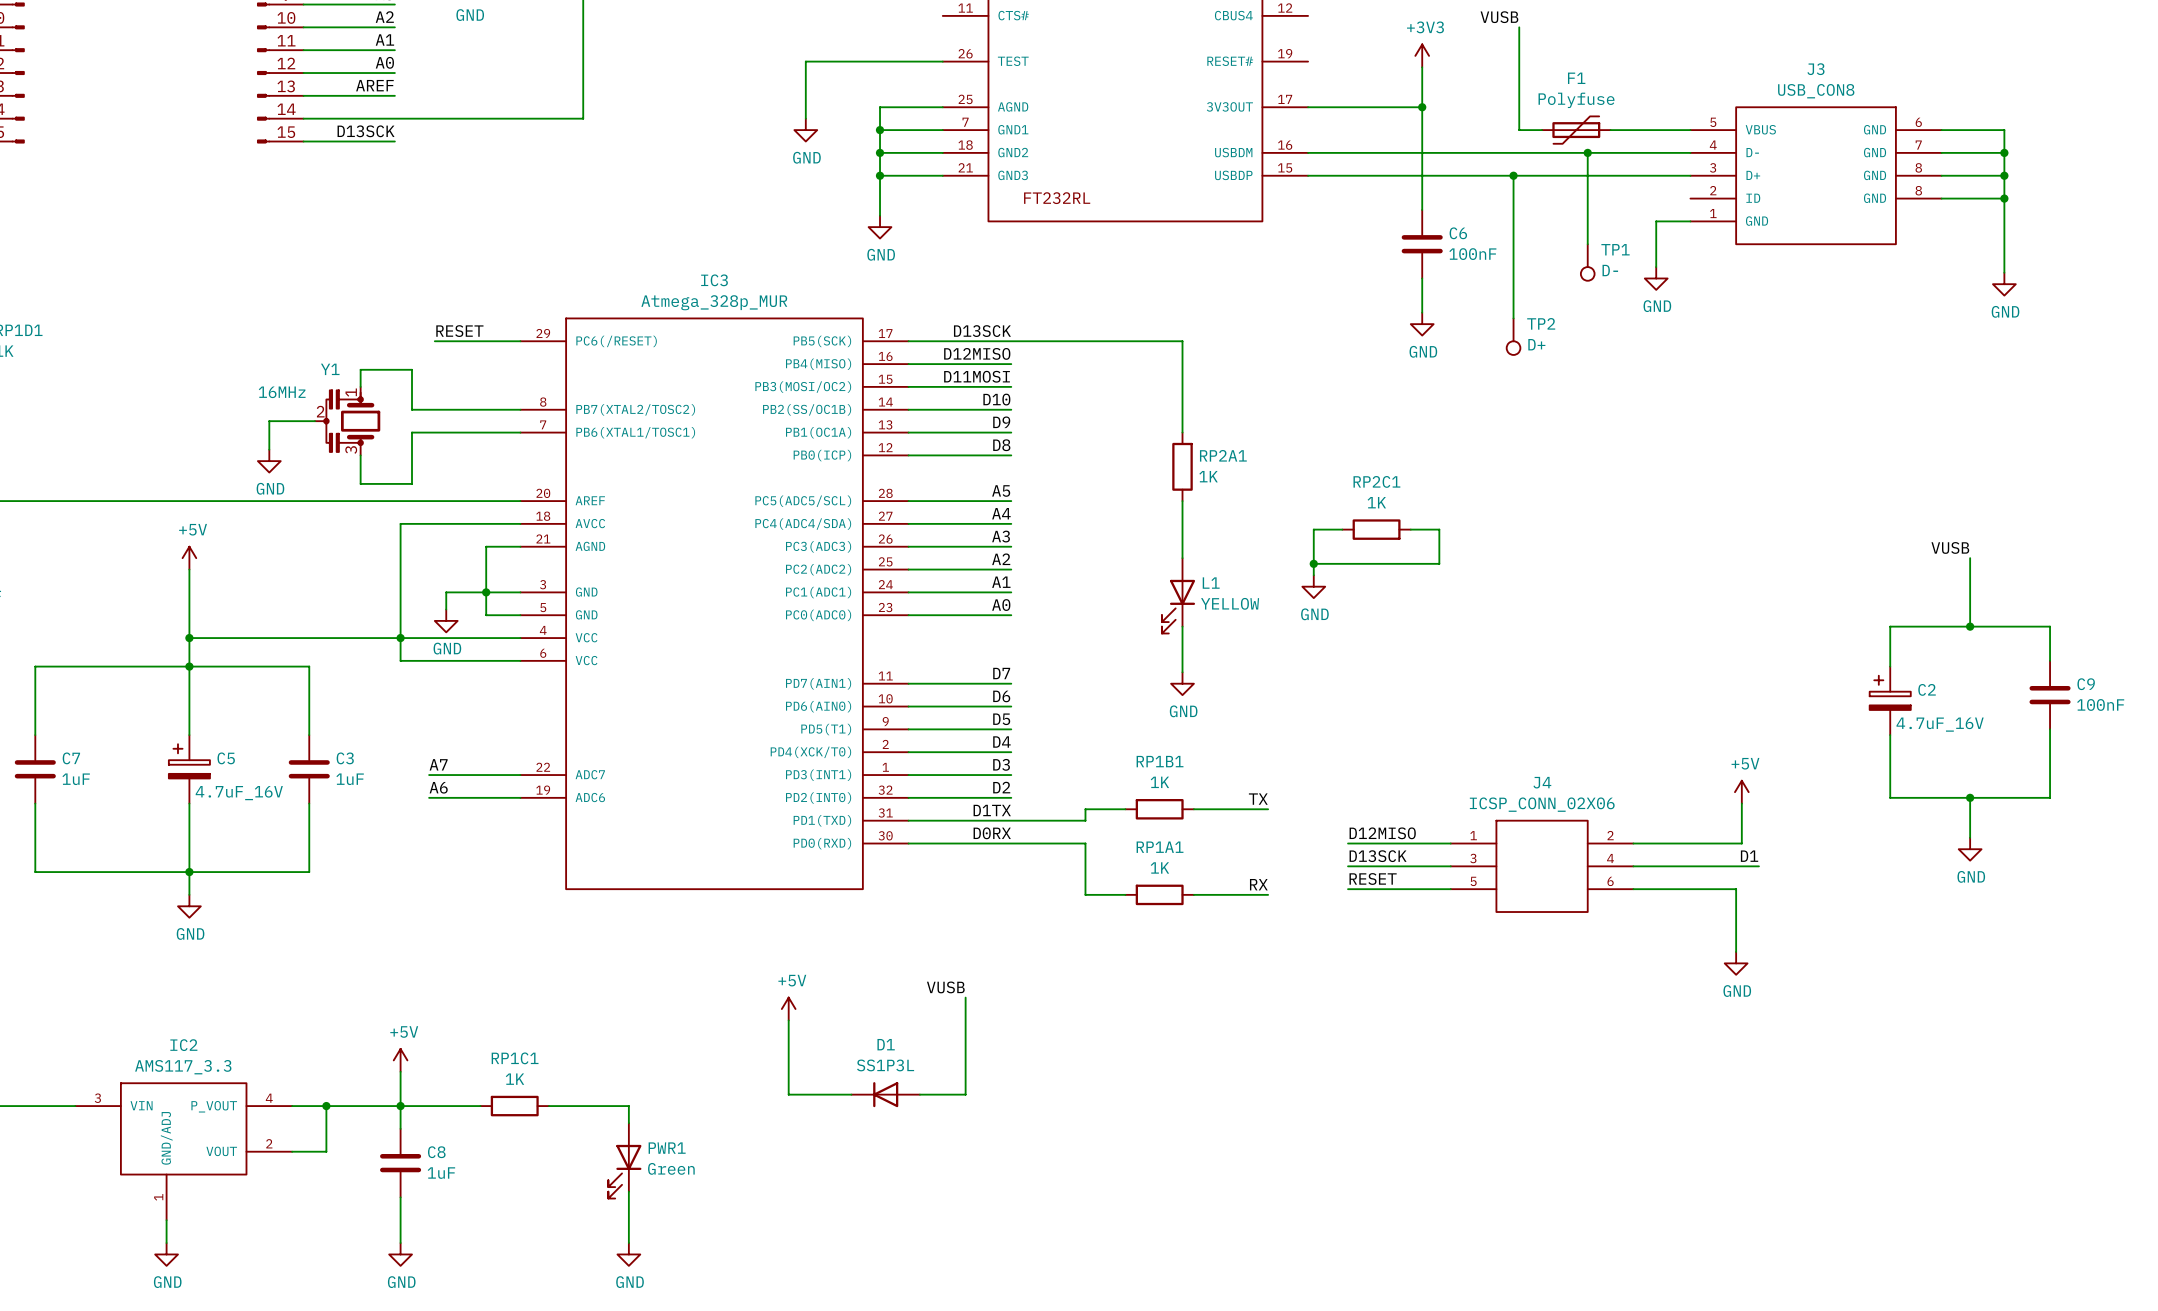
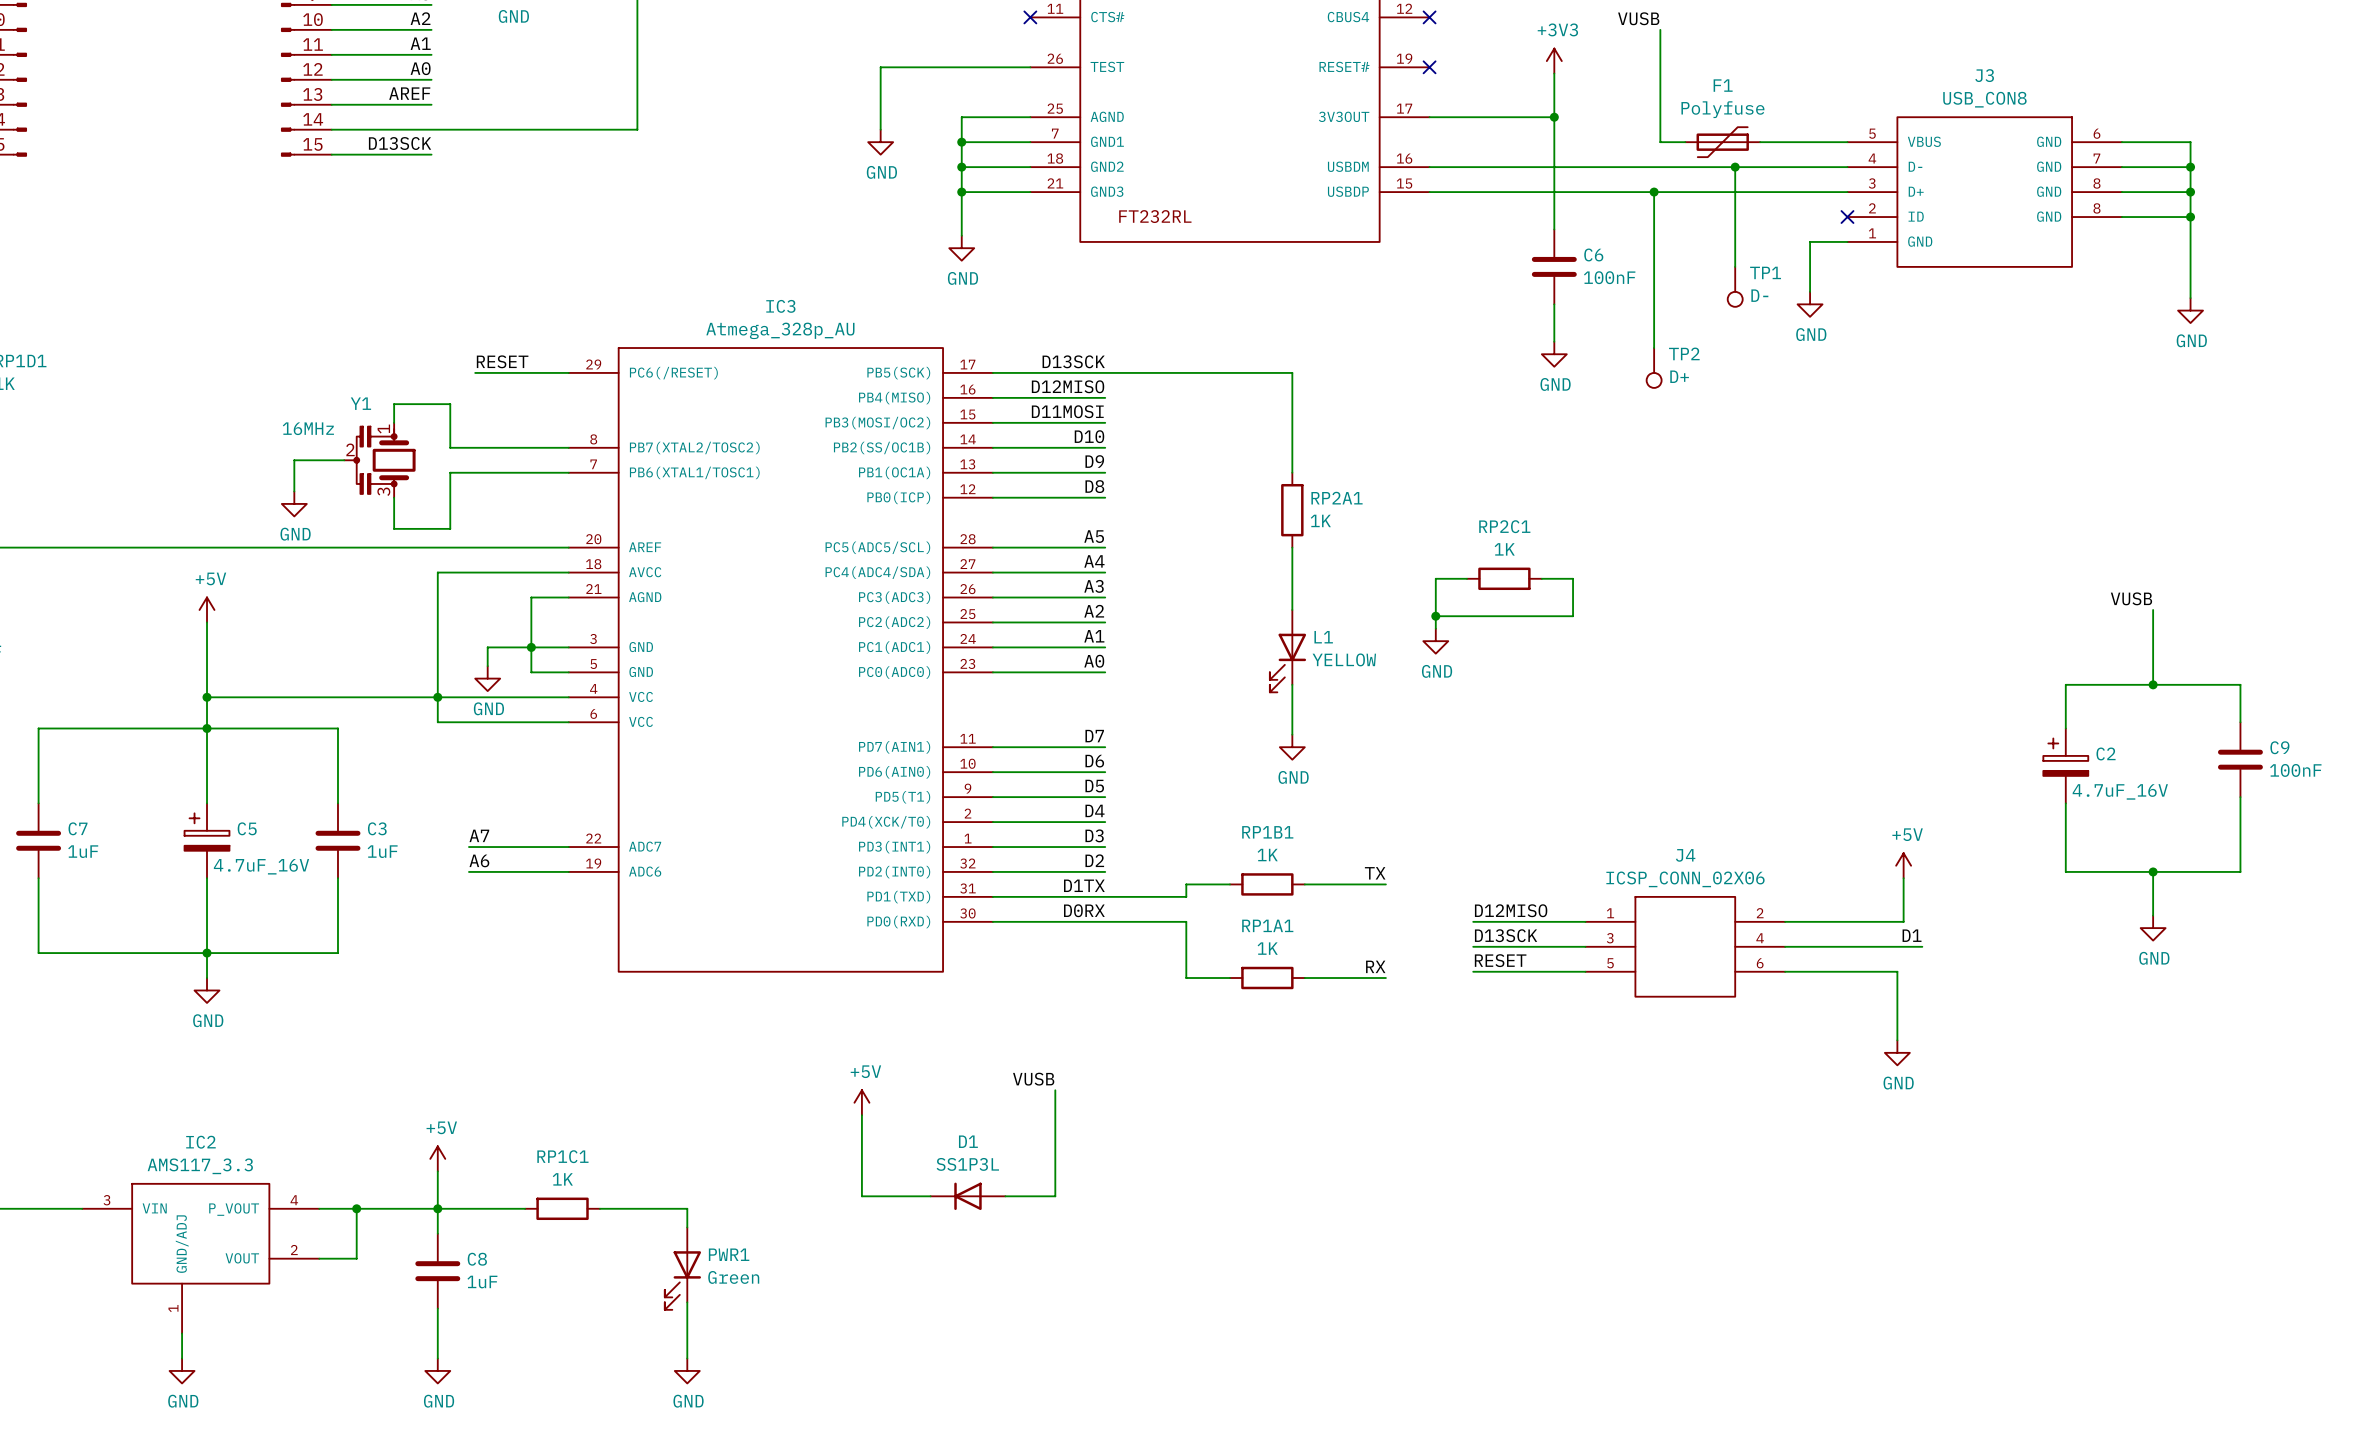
no-connect mark: none -> (1030, 17)
no-connect mark: none -> (1429, 17)
no-connect mark: none -> (1429, 67)
no-connect mark: none -> (1847, 217)
IC3 value: Atmega_328p_MUR (714, 302) -> Atmega_328p_AU (780, 330)

